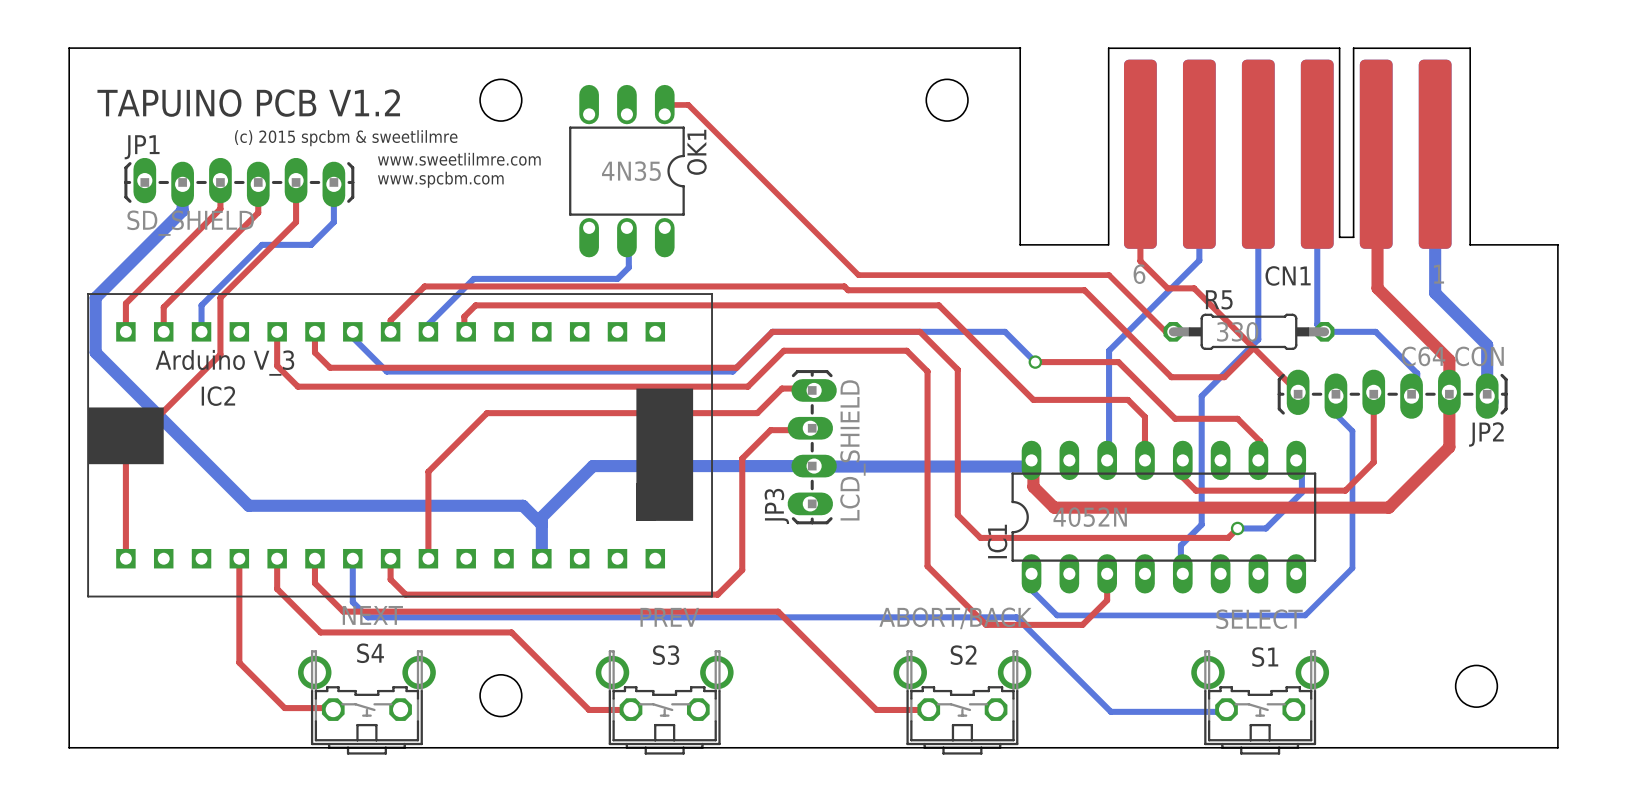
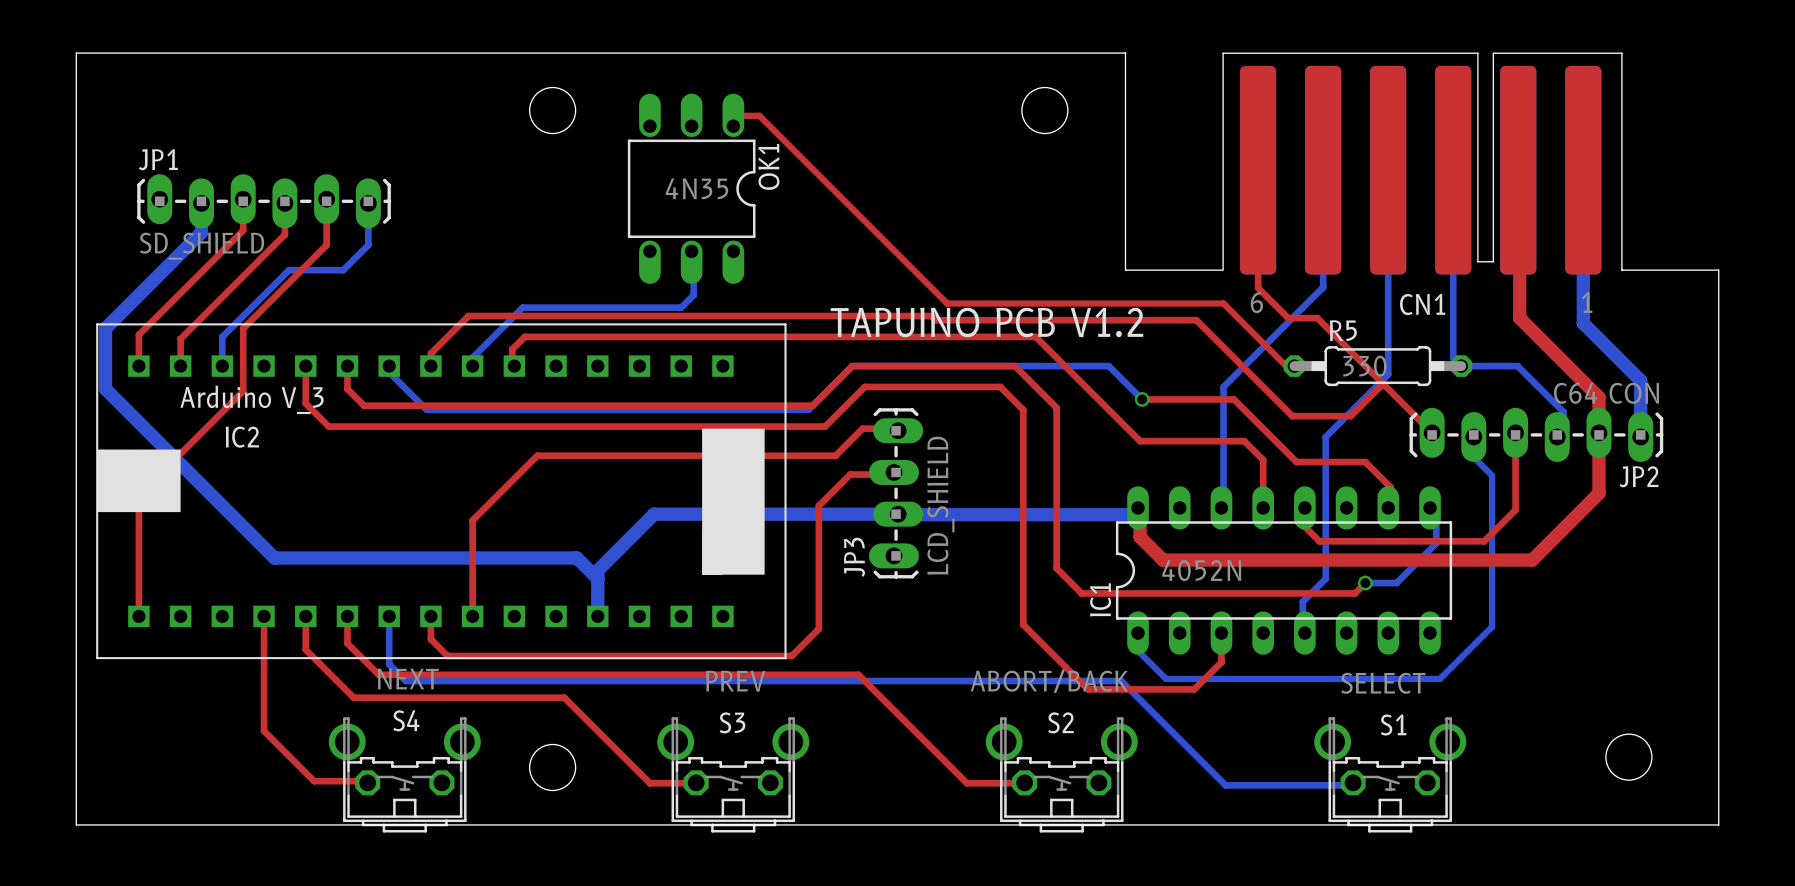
text: TAPUINO PCB V1.2 (248, 103) -> none
text: (c) 2015 spcbm & sweetlilmre (346, 138) -> none
text: www.sweetlilmre.com (459, 159) -> none
text: www.spcbm.com (440, 179) -> none
text: none -> TAPUINO PCB V1.2 (986, 322)

